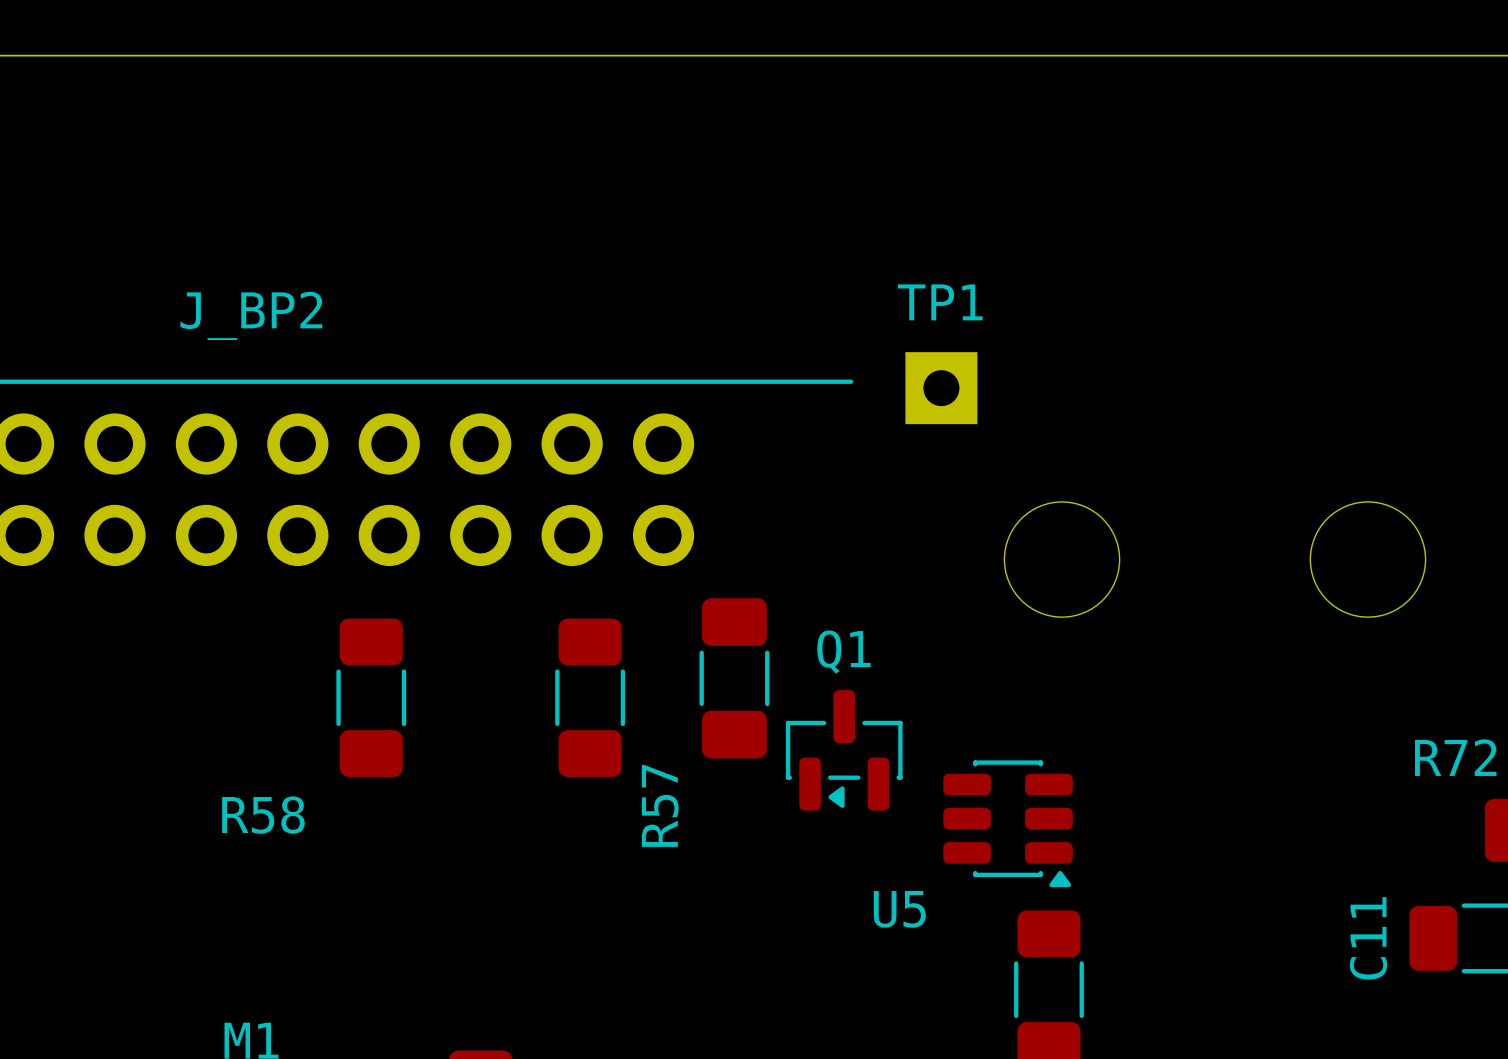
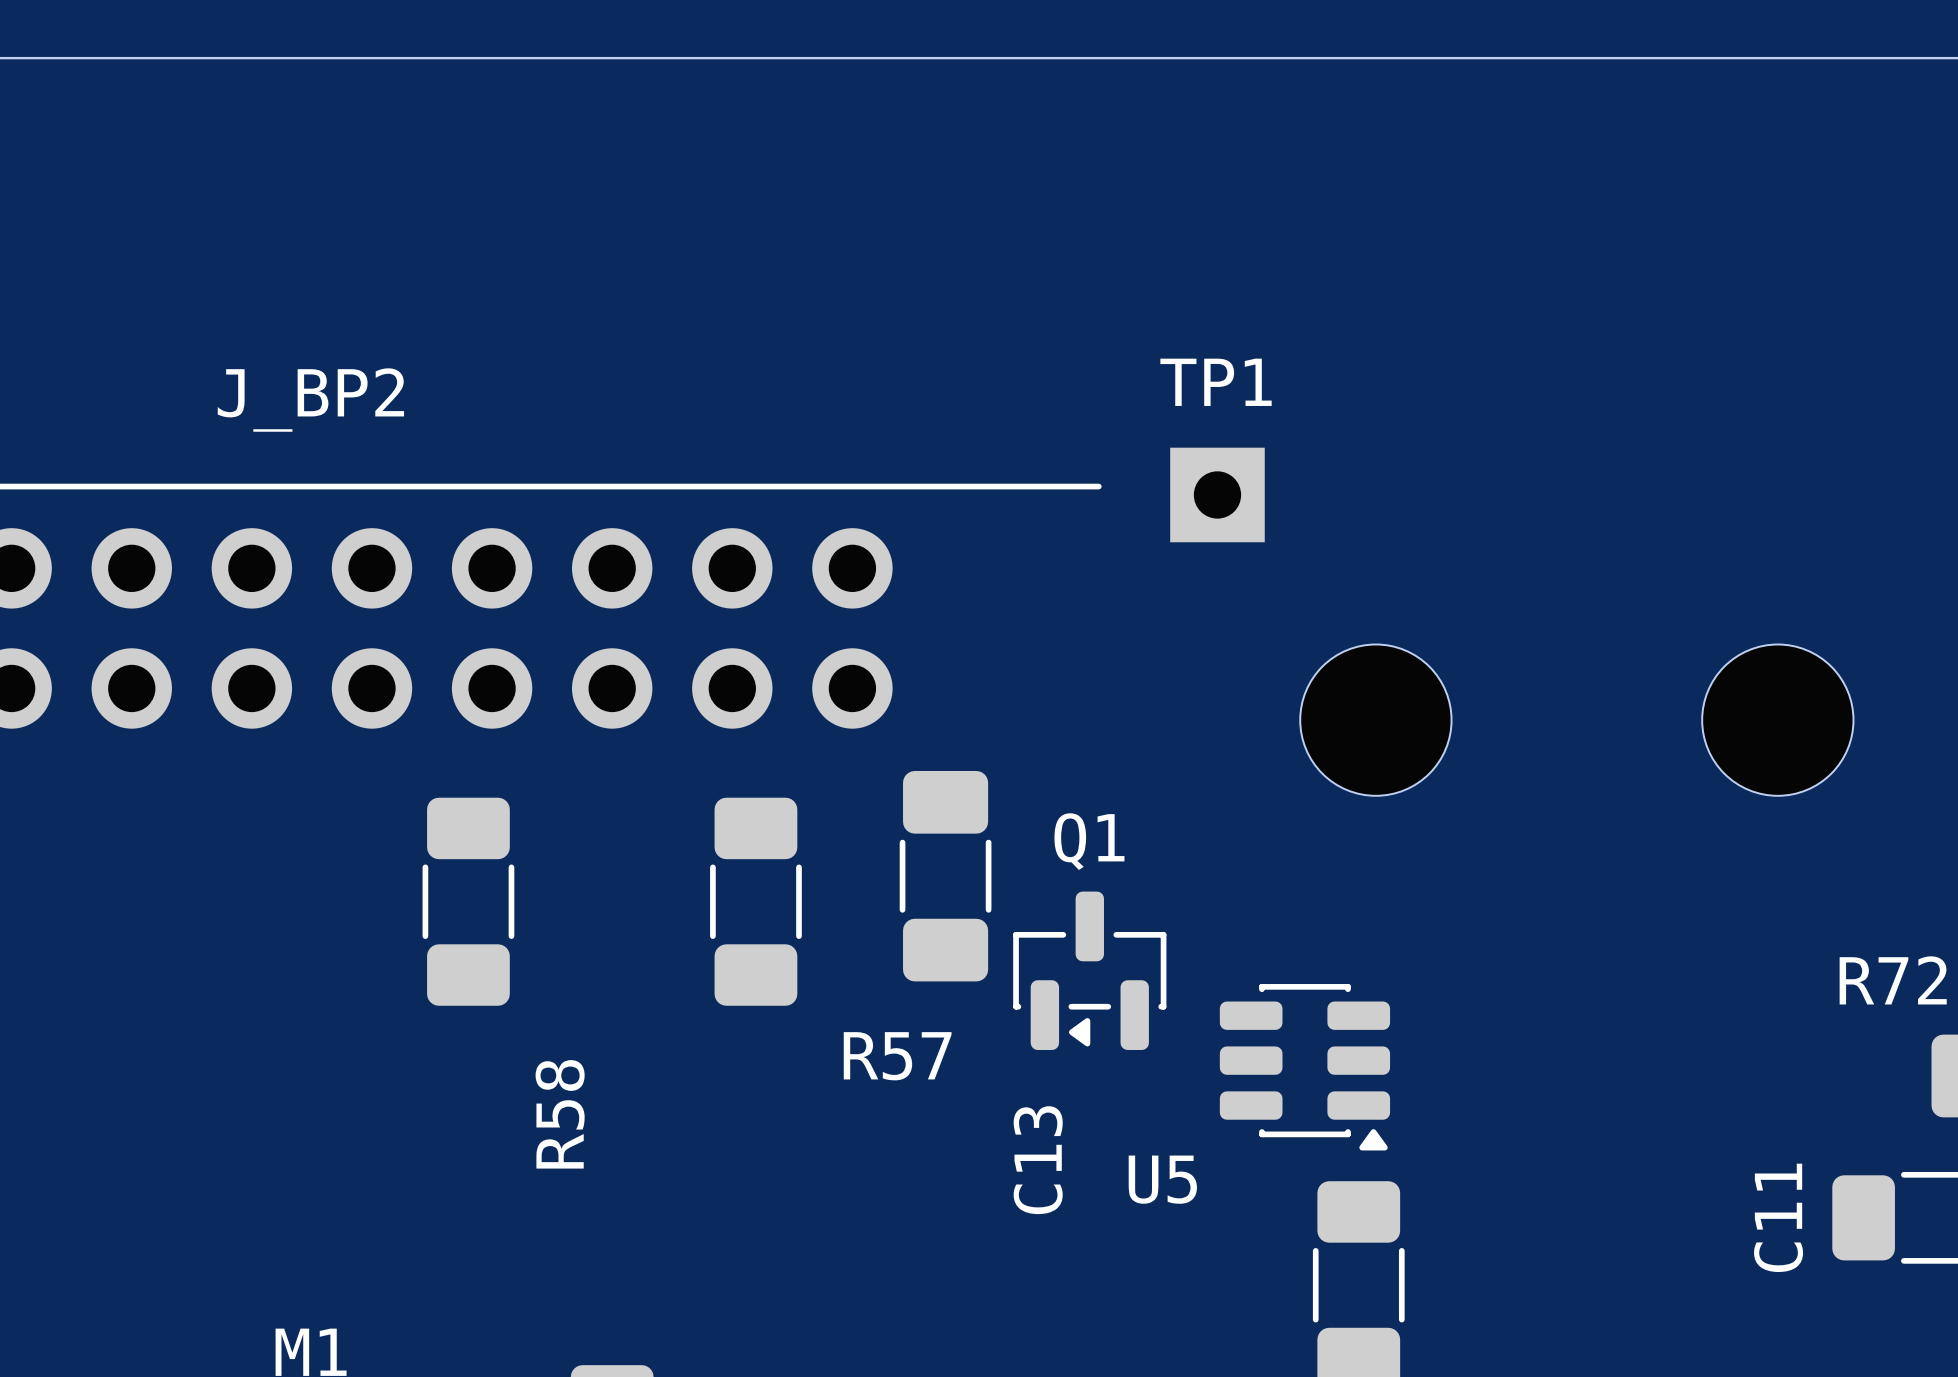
R57 name rotation: 0° (660, 805) -> 90° clockwise (897, 1056)
R58 name rotation: 0° (263, 815) -> 90° counterclockwise (560, 1114)
R58 name position: R58 (263, 815) -> R58 (560, 1114)
C13 name: none -> C13 (1038, 1160)

